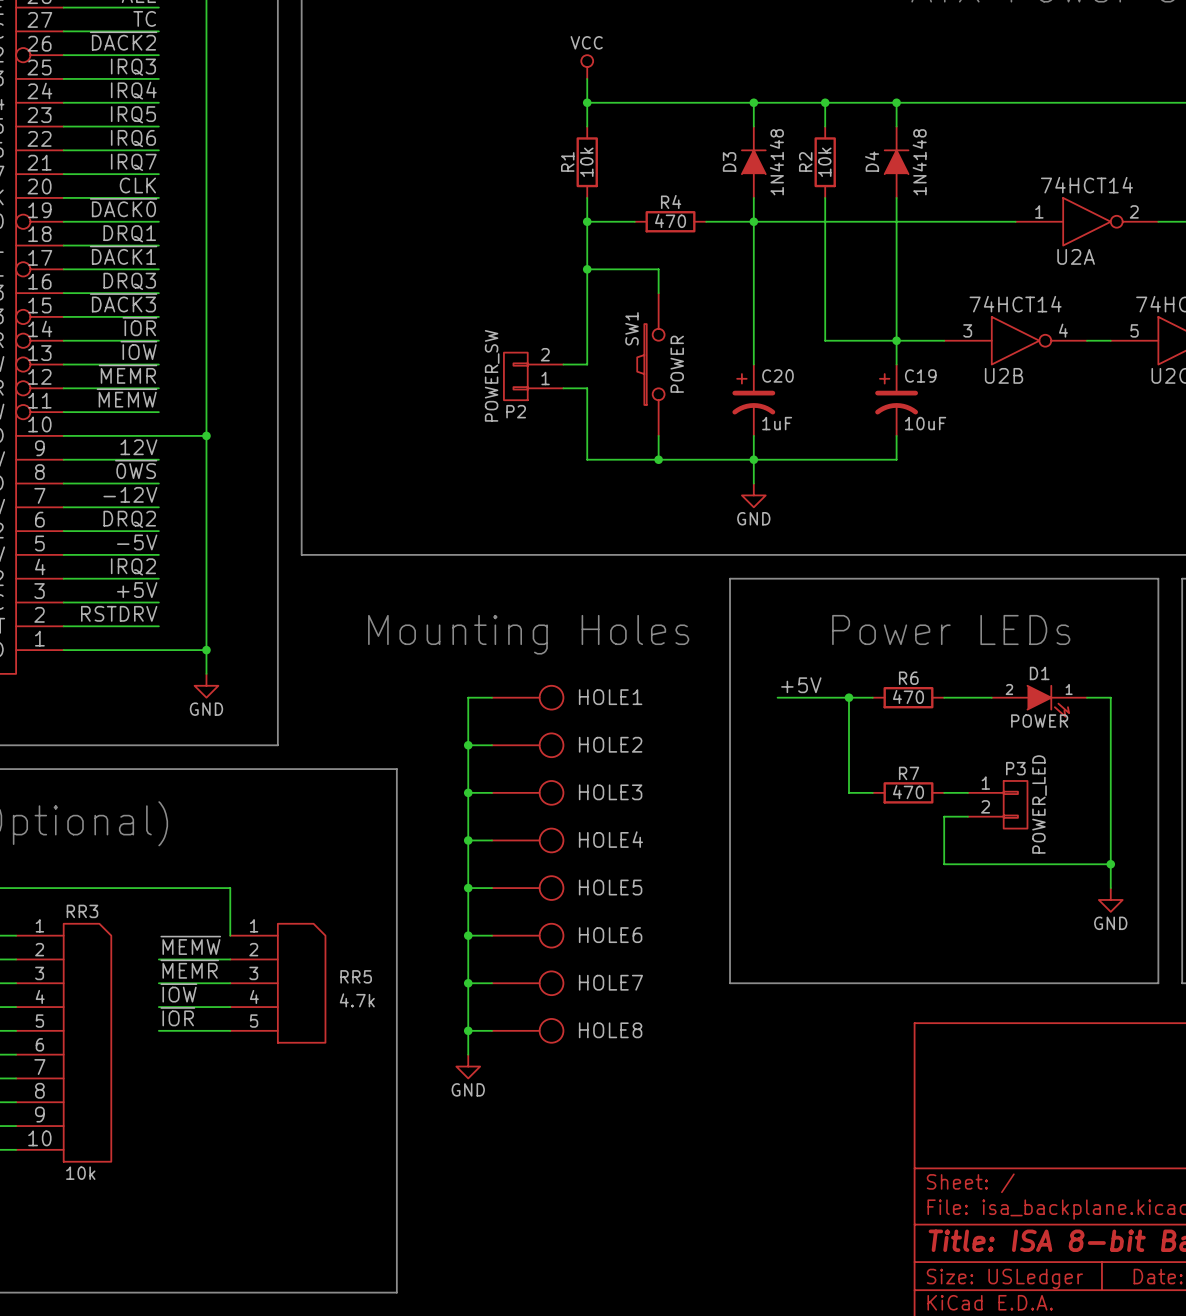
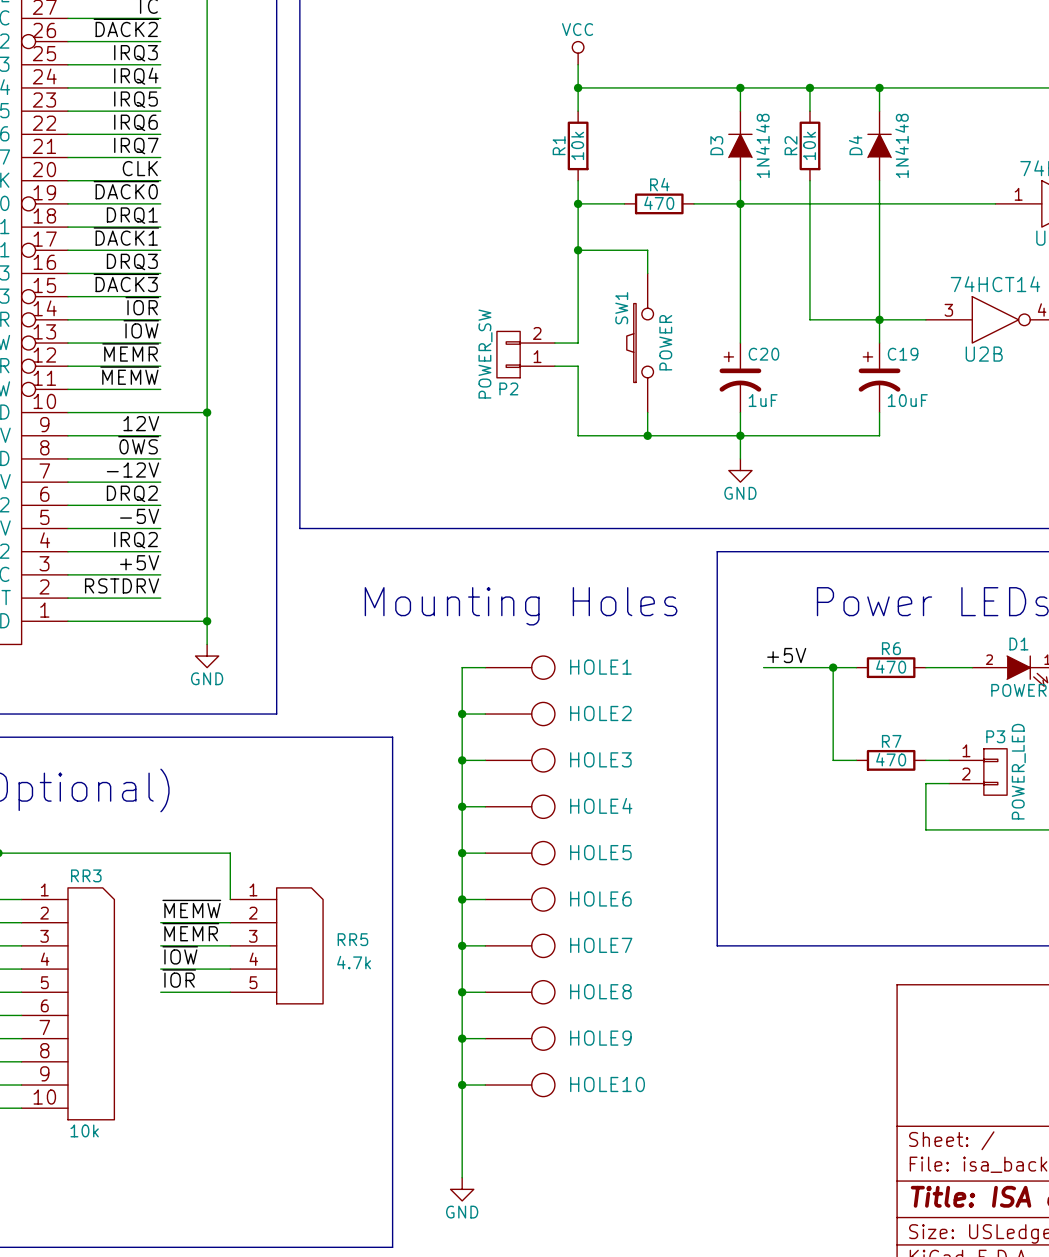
wire: none -> (462, 1015) (462, 1177)
power symbol position: GND (468, 1066) -> GND (462, 1189)
wire: none -> (462, 1038) (485, 1038)
junction: none -> (462, 1038)
HOLE9: none -> (520, 1038)
wire: none -> (462, 1085) (485, 1085)
junction: none -> (462, 1085)
HOLE10: none -> (520, 1085)

